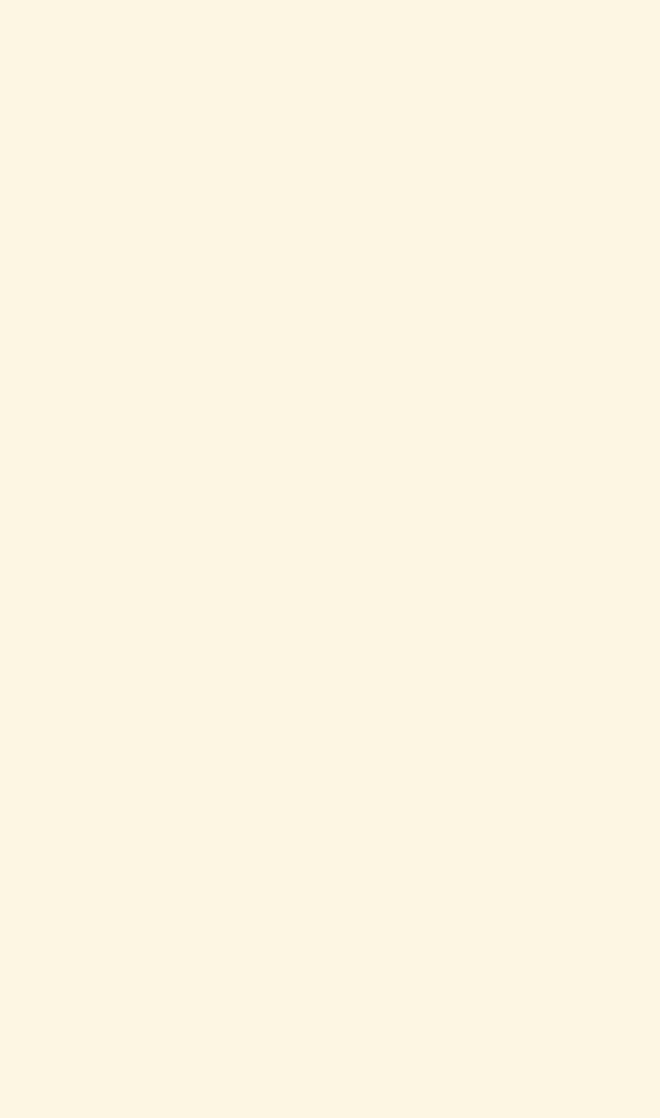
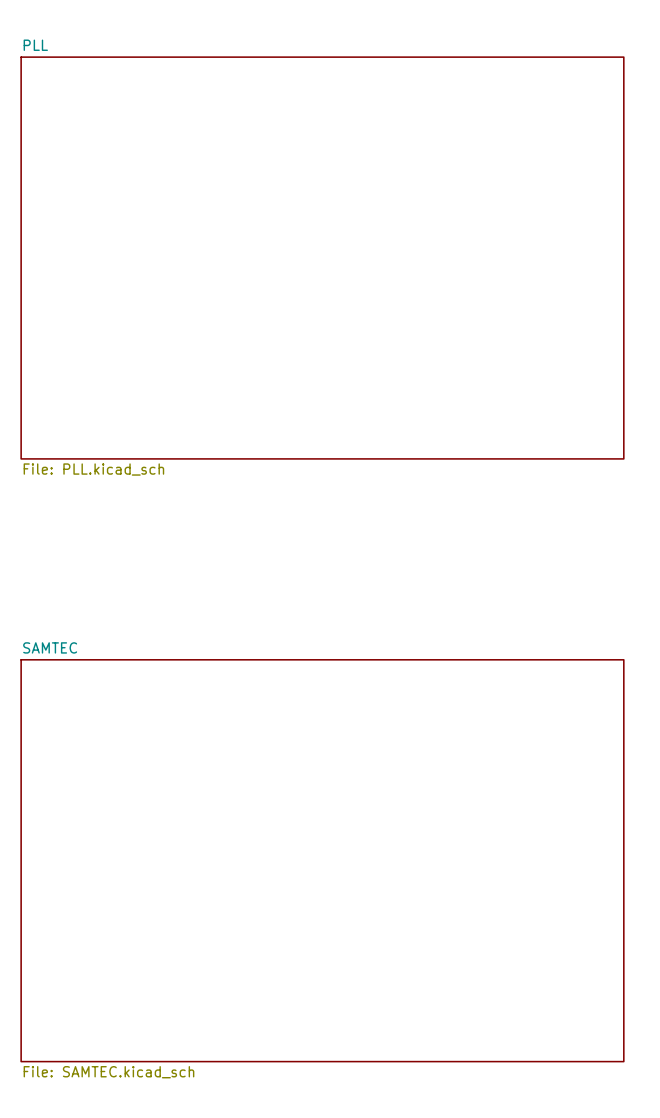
sheet PLL: none -> File: PLL.kicad_sch (322, 258)
sheet SAMTEC: none -> File: SAMTEC.kicad_sch (322, 860)

